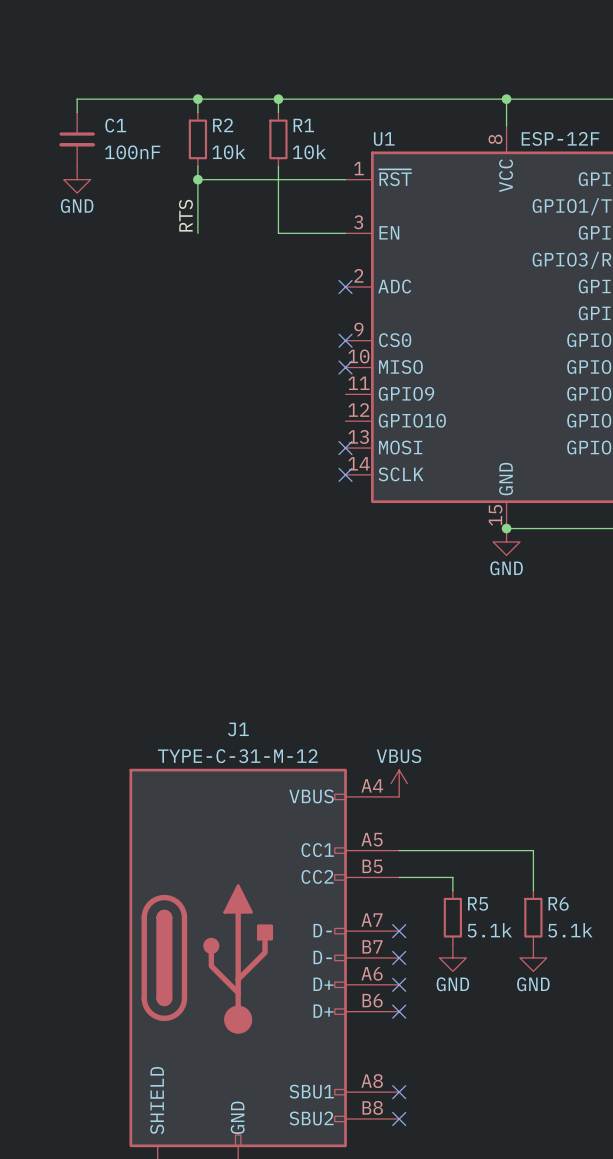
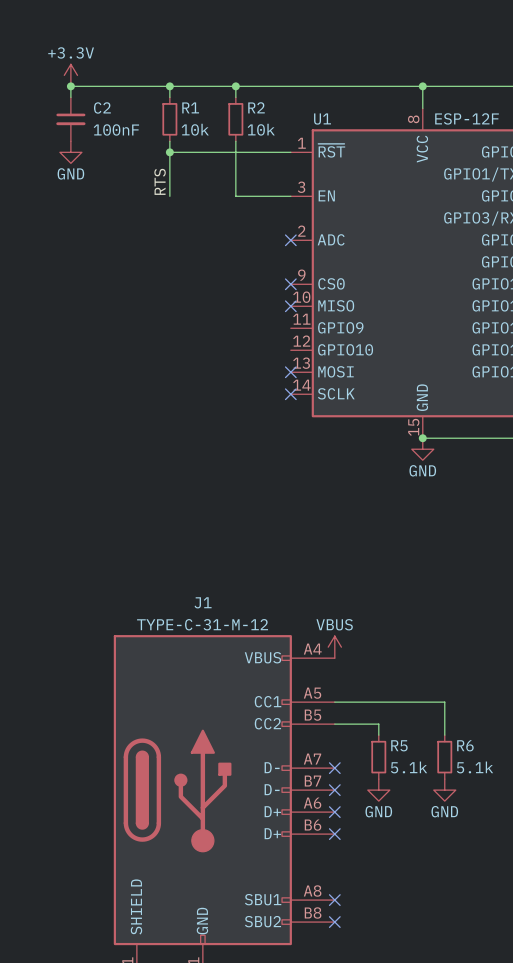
power symbol: none -> +3.3V (70, 75)
junction: none -> (70, 86)
C1 name: C1 (115, 125) -> C2 (102, 107)
R2 name: R2 (223, 125) -> R1 (190, 107)
R1 name: R1 (303, 125) -> R2 (256, 107)

